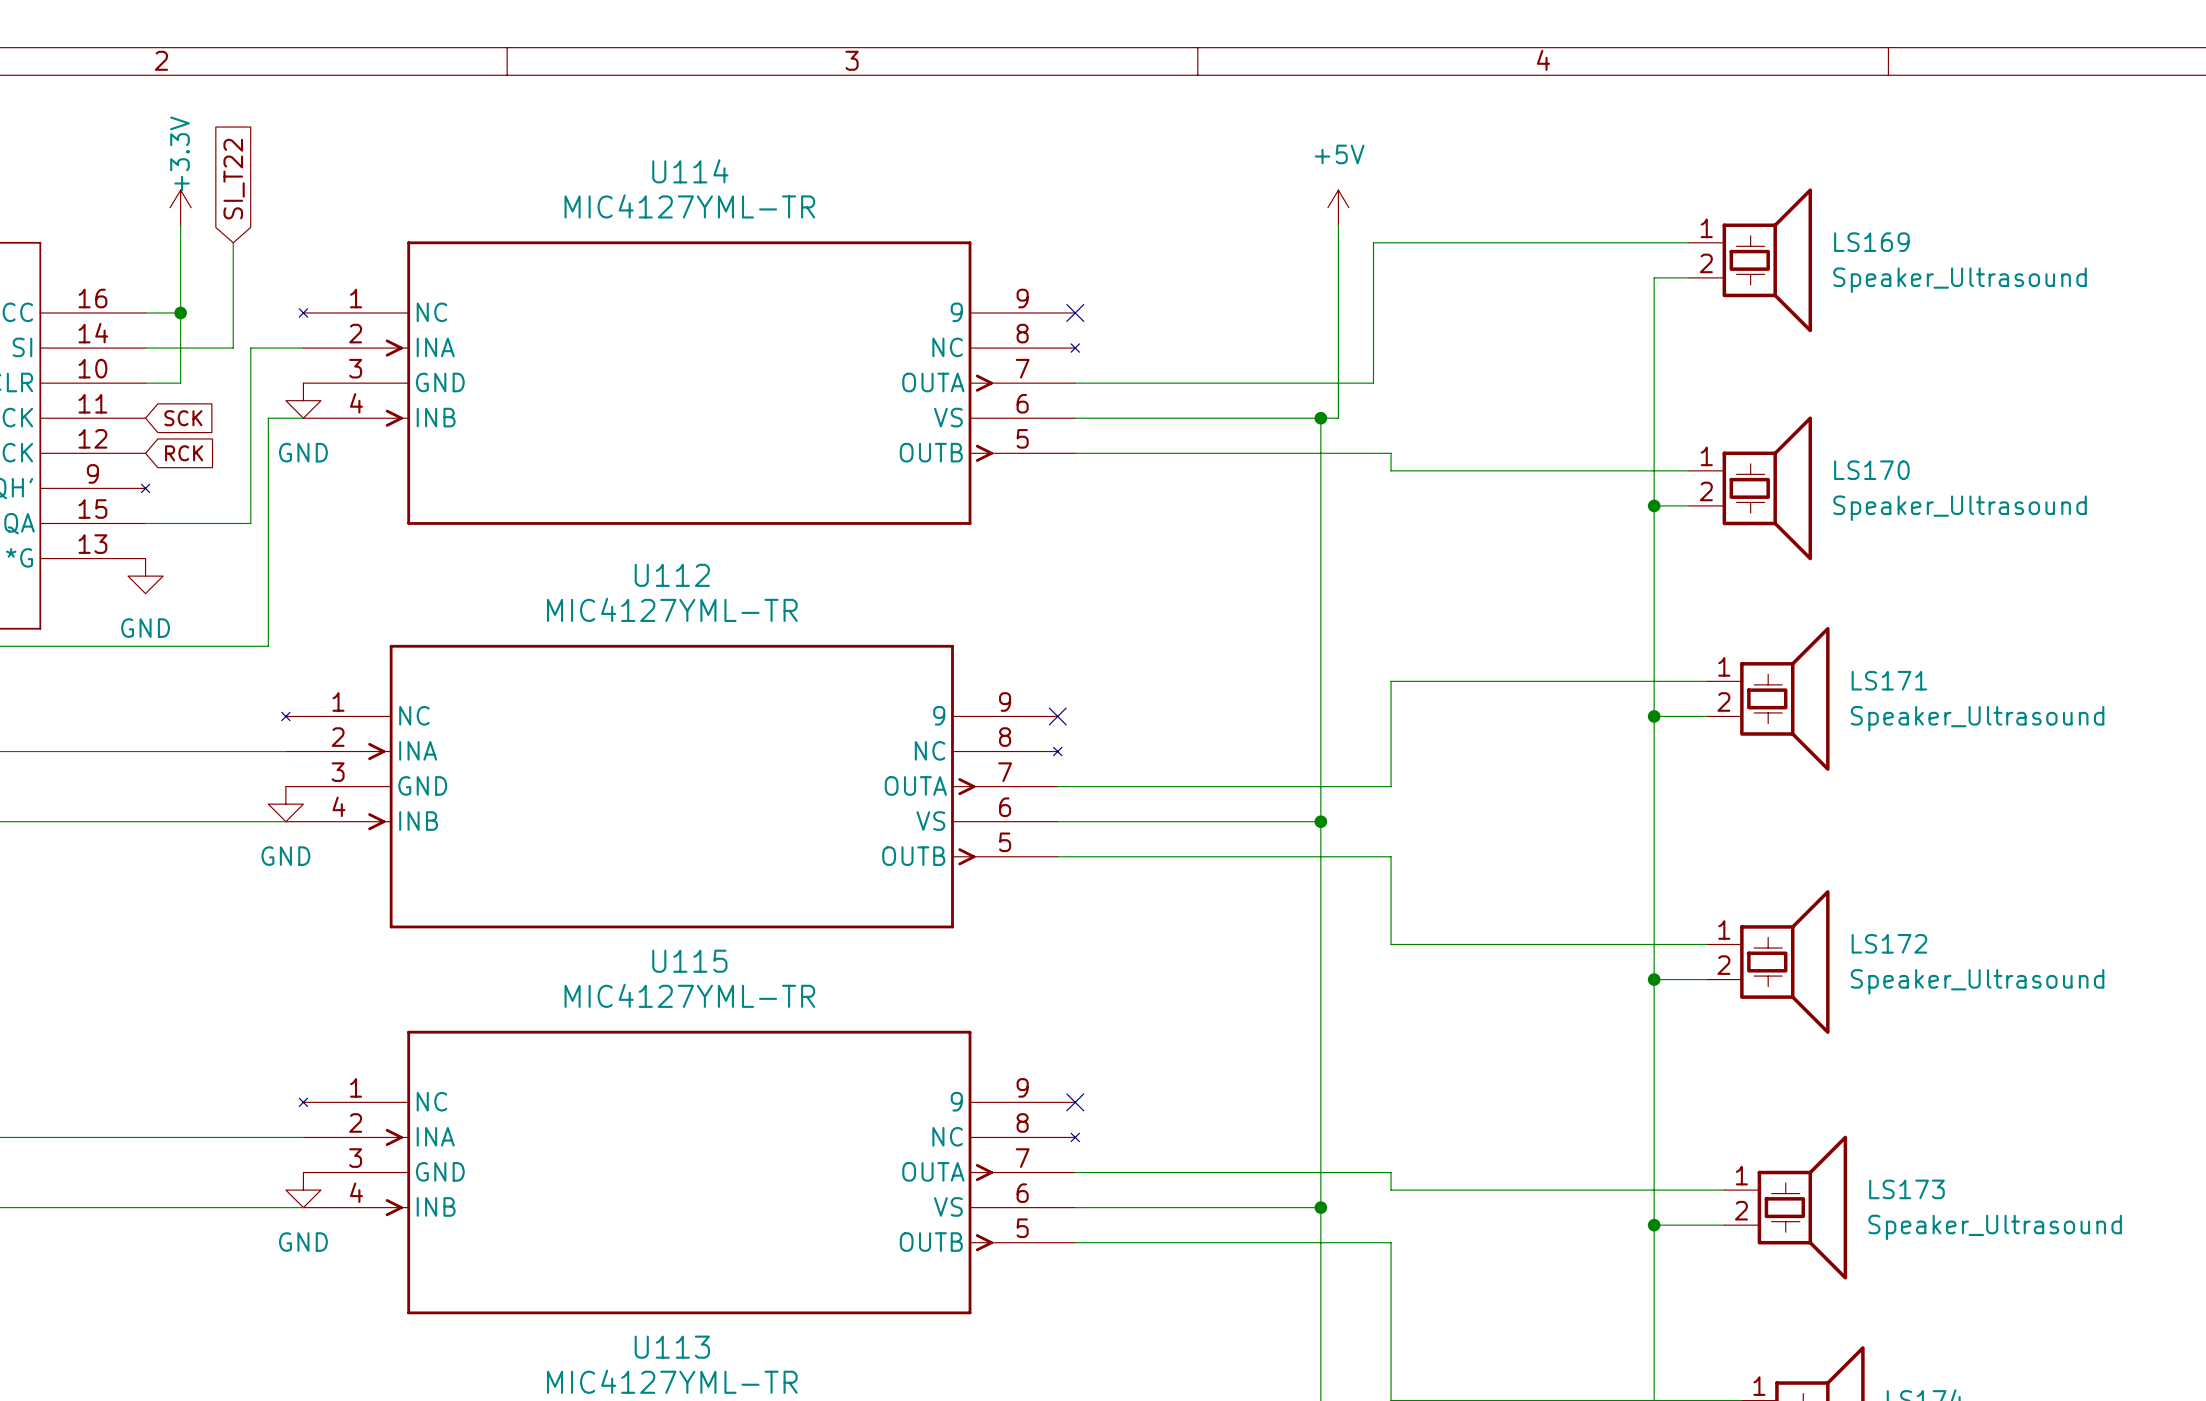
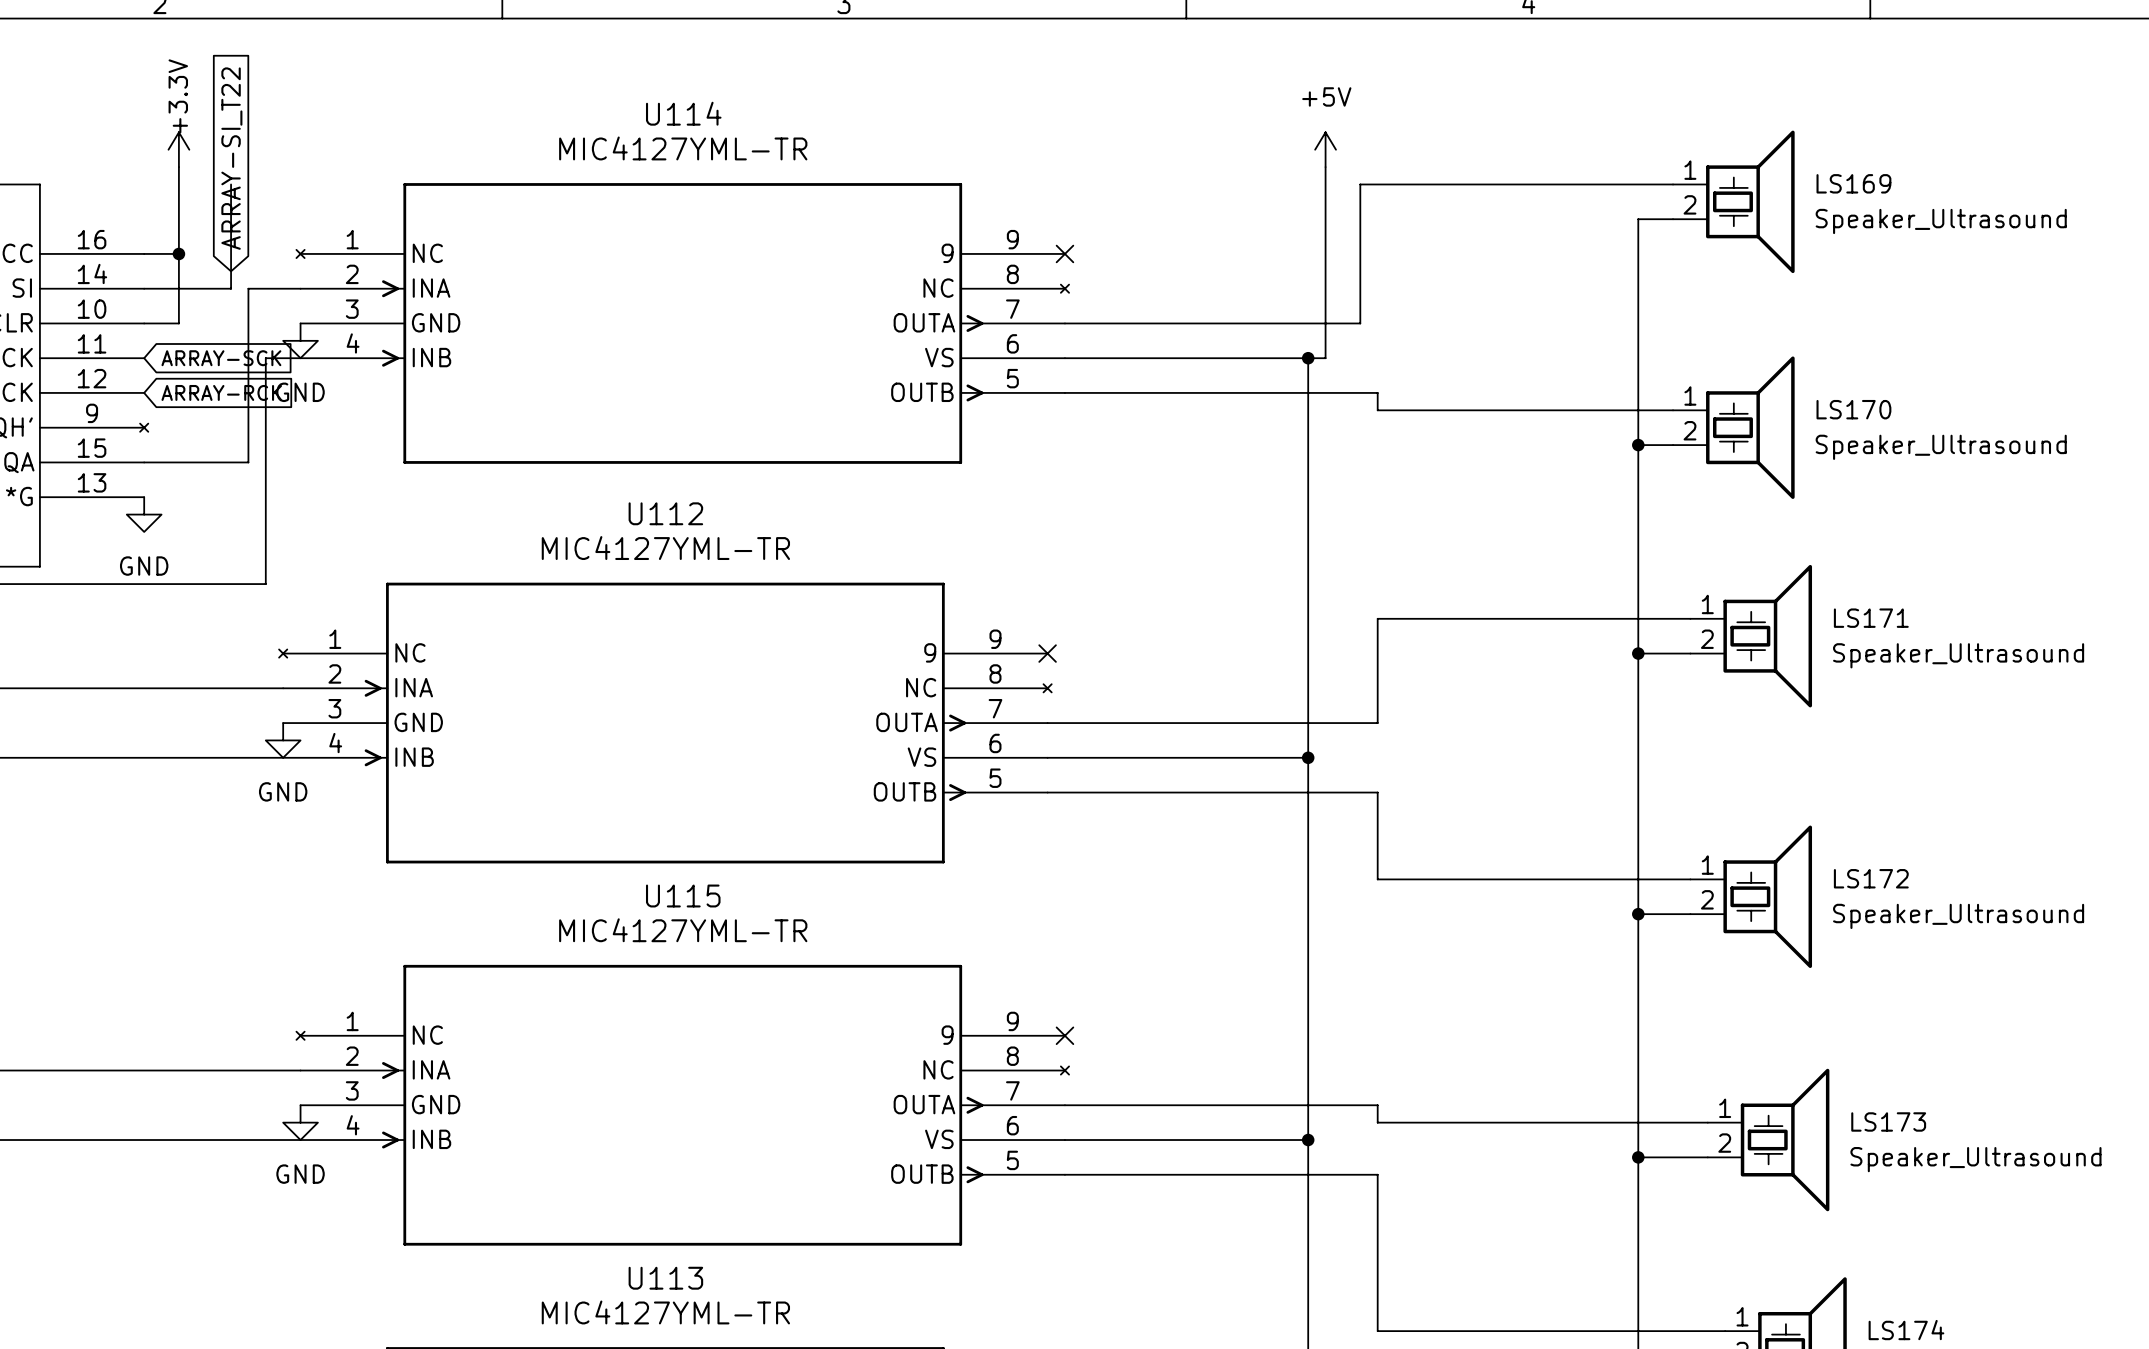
global label: SI_T22 (234, 179) -> ARRAY-SI_T22 (231, 158)
global label: SCK (183, 418) -> ARRAY-SCK (221, 358)
global label: RCK (184, 453) -> ARRAY-RCK (221, 392)

